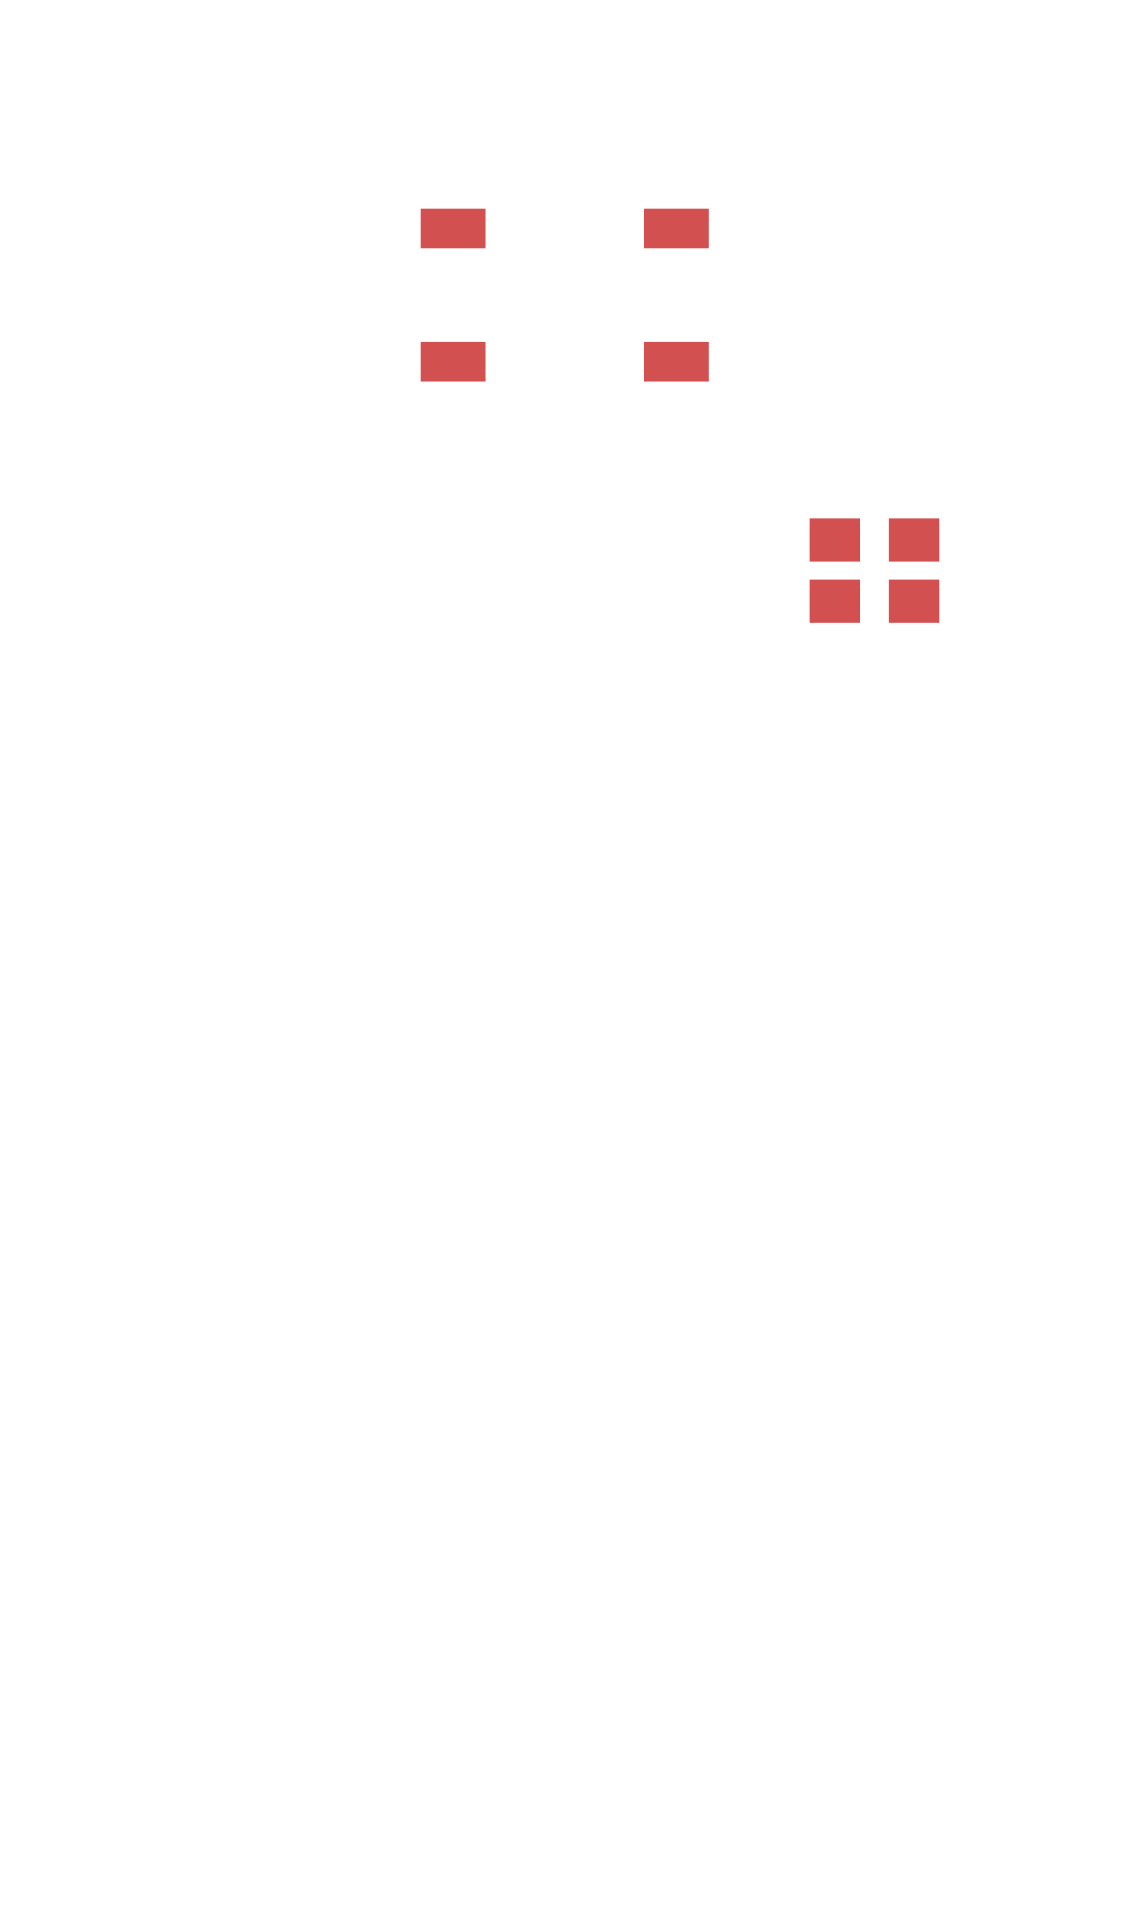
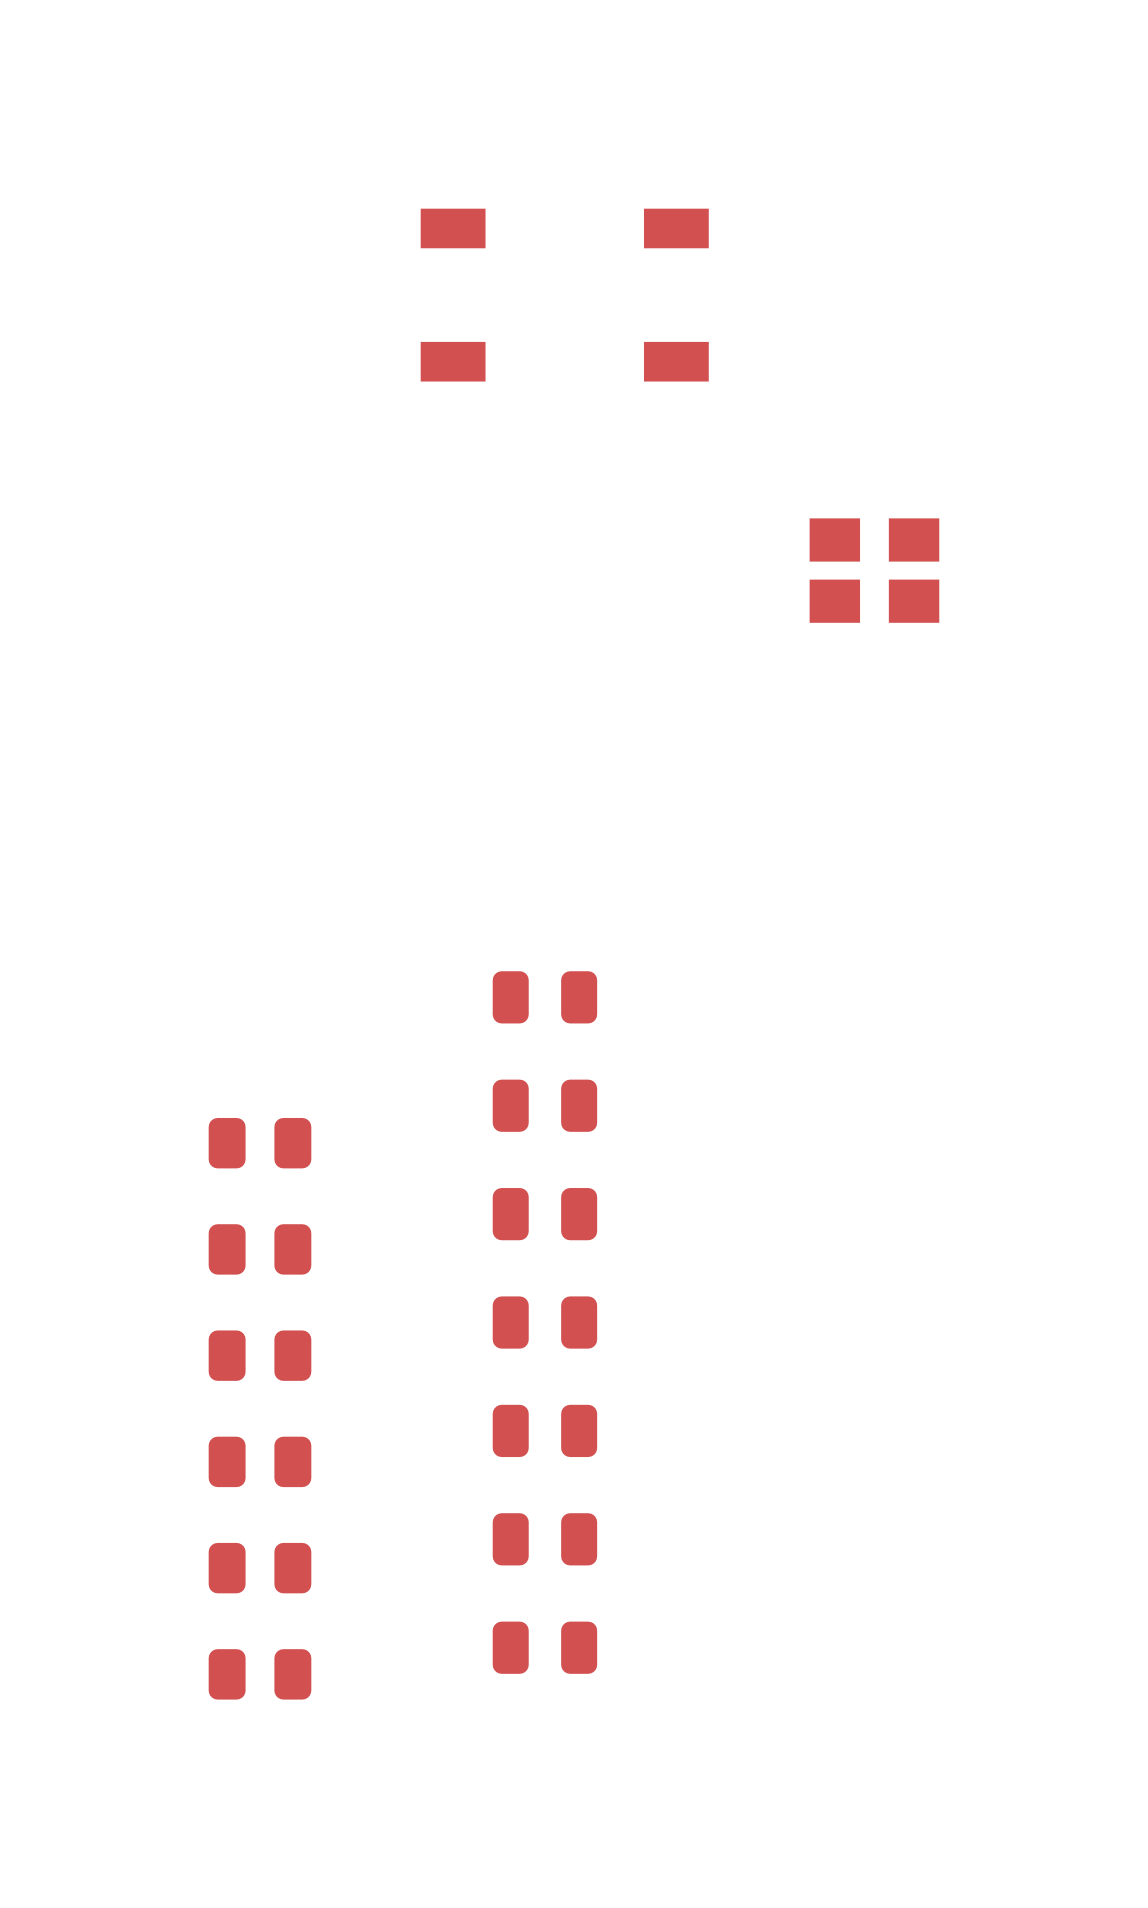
part: none -> (544, 997)
part: none -> (544, 1105)
part: none -> (259, 1143)
part: none -> (544, 1214)
part: none -> (259, 1249)
part: none -> (544, 1322)
part: none -> (259, 1355)
part: none -> (544, 1430)
part: none -> (259, 1461)
part: none -> (544, 1539)
part: none -> (259, 1568)
part: none -> (544, 1647)
part: none -> (259, 1674)

